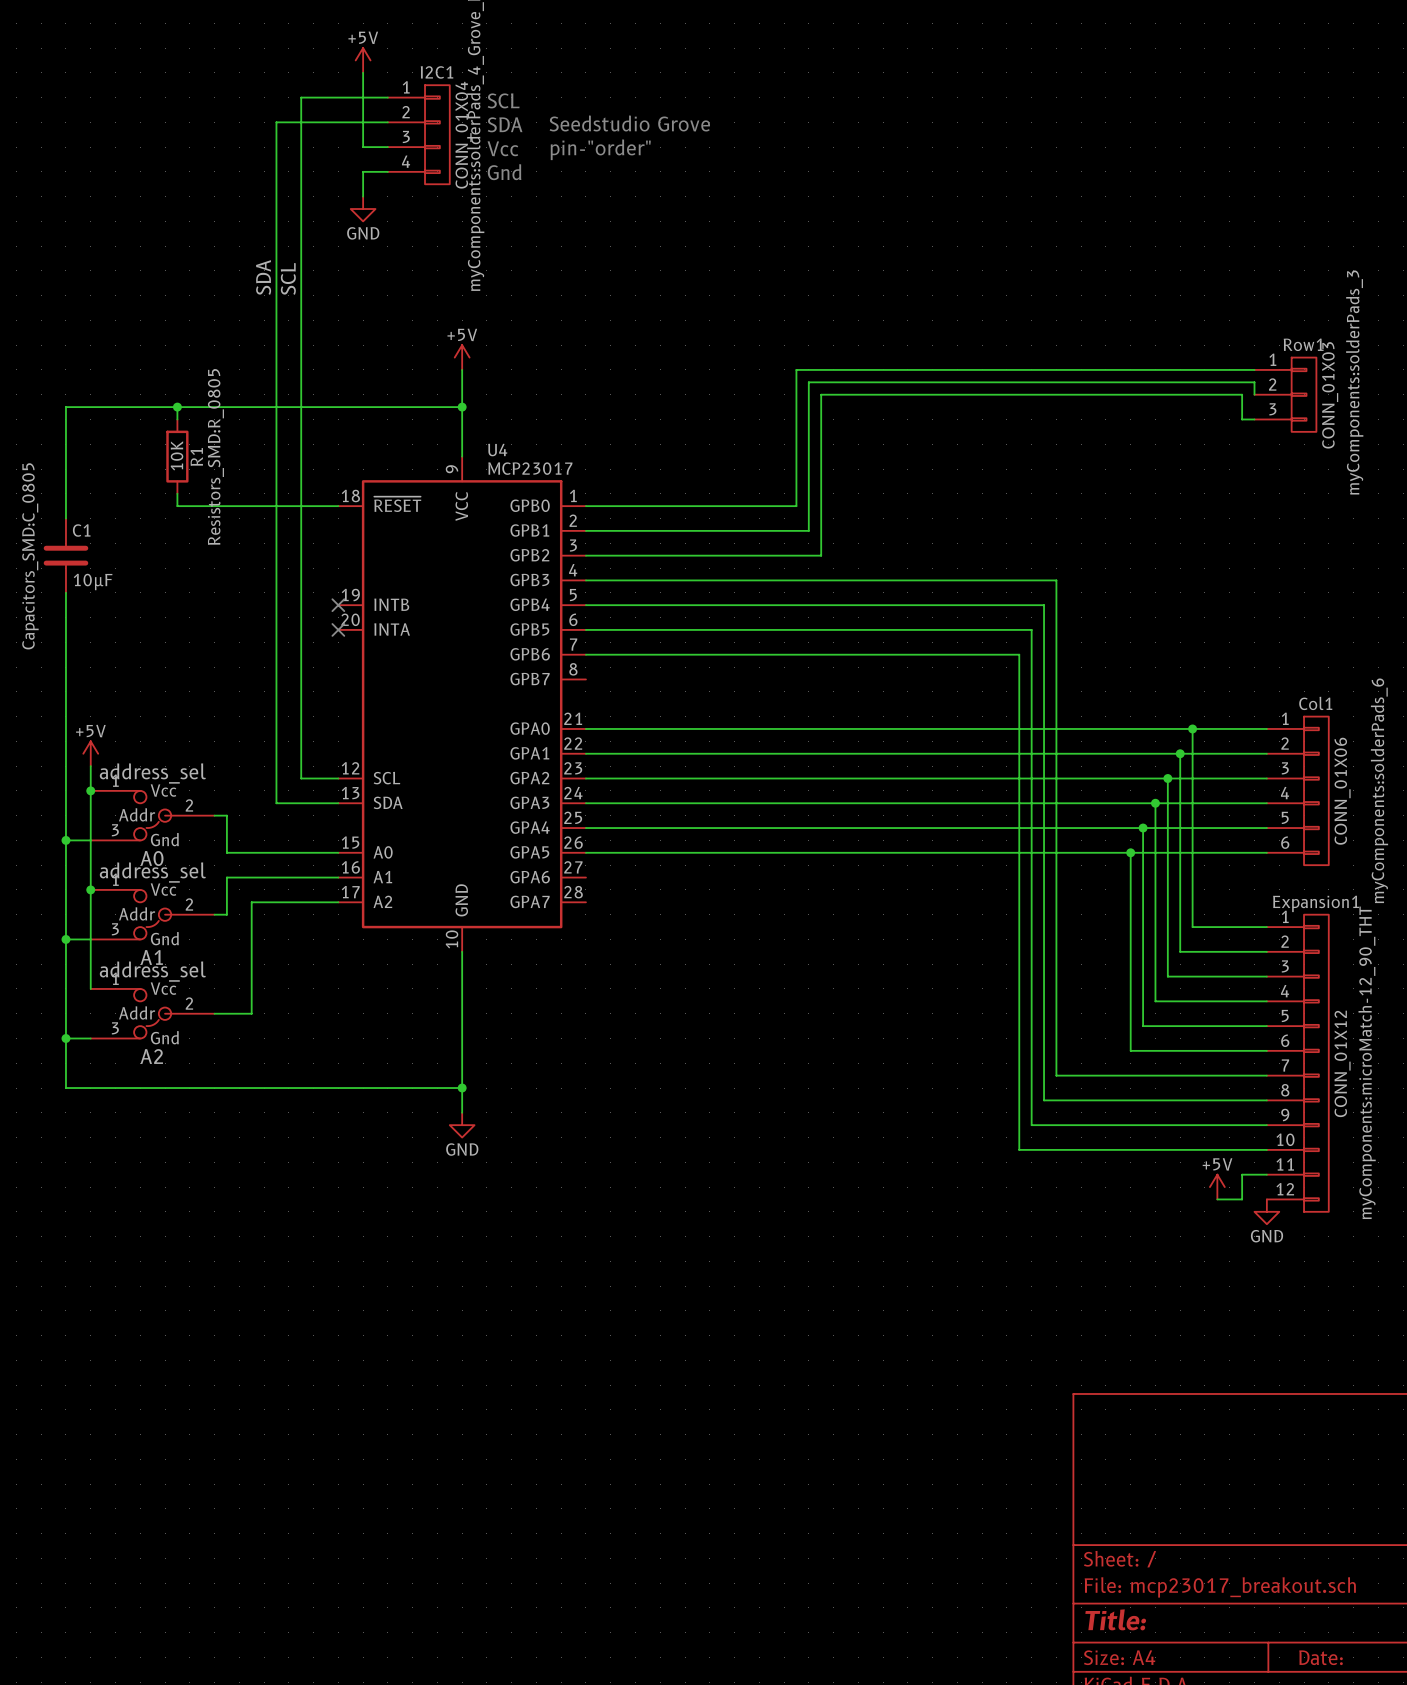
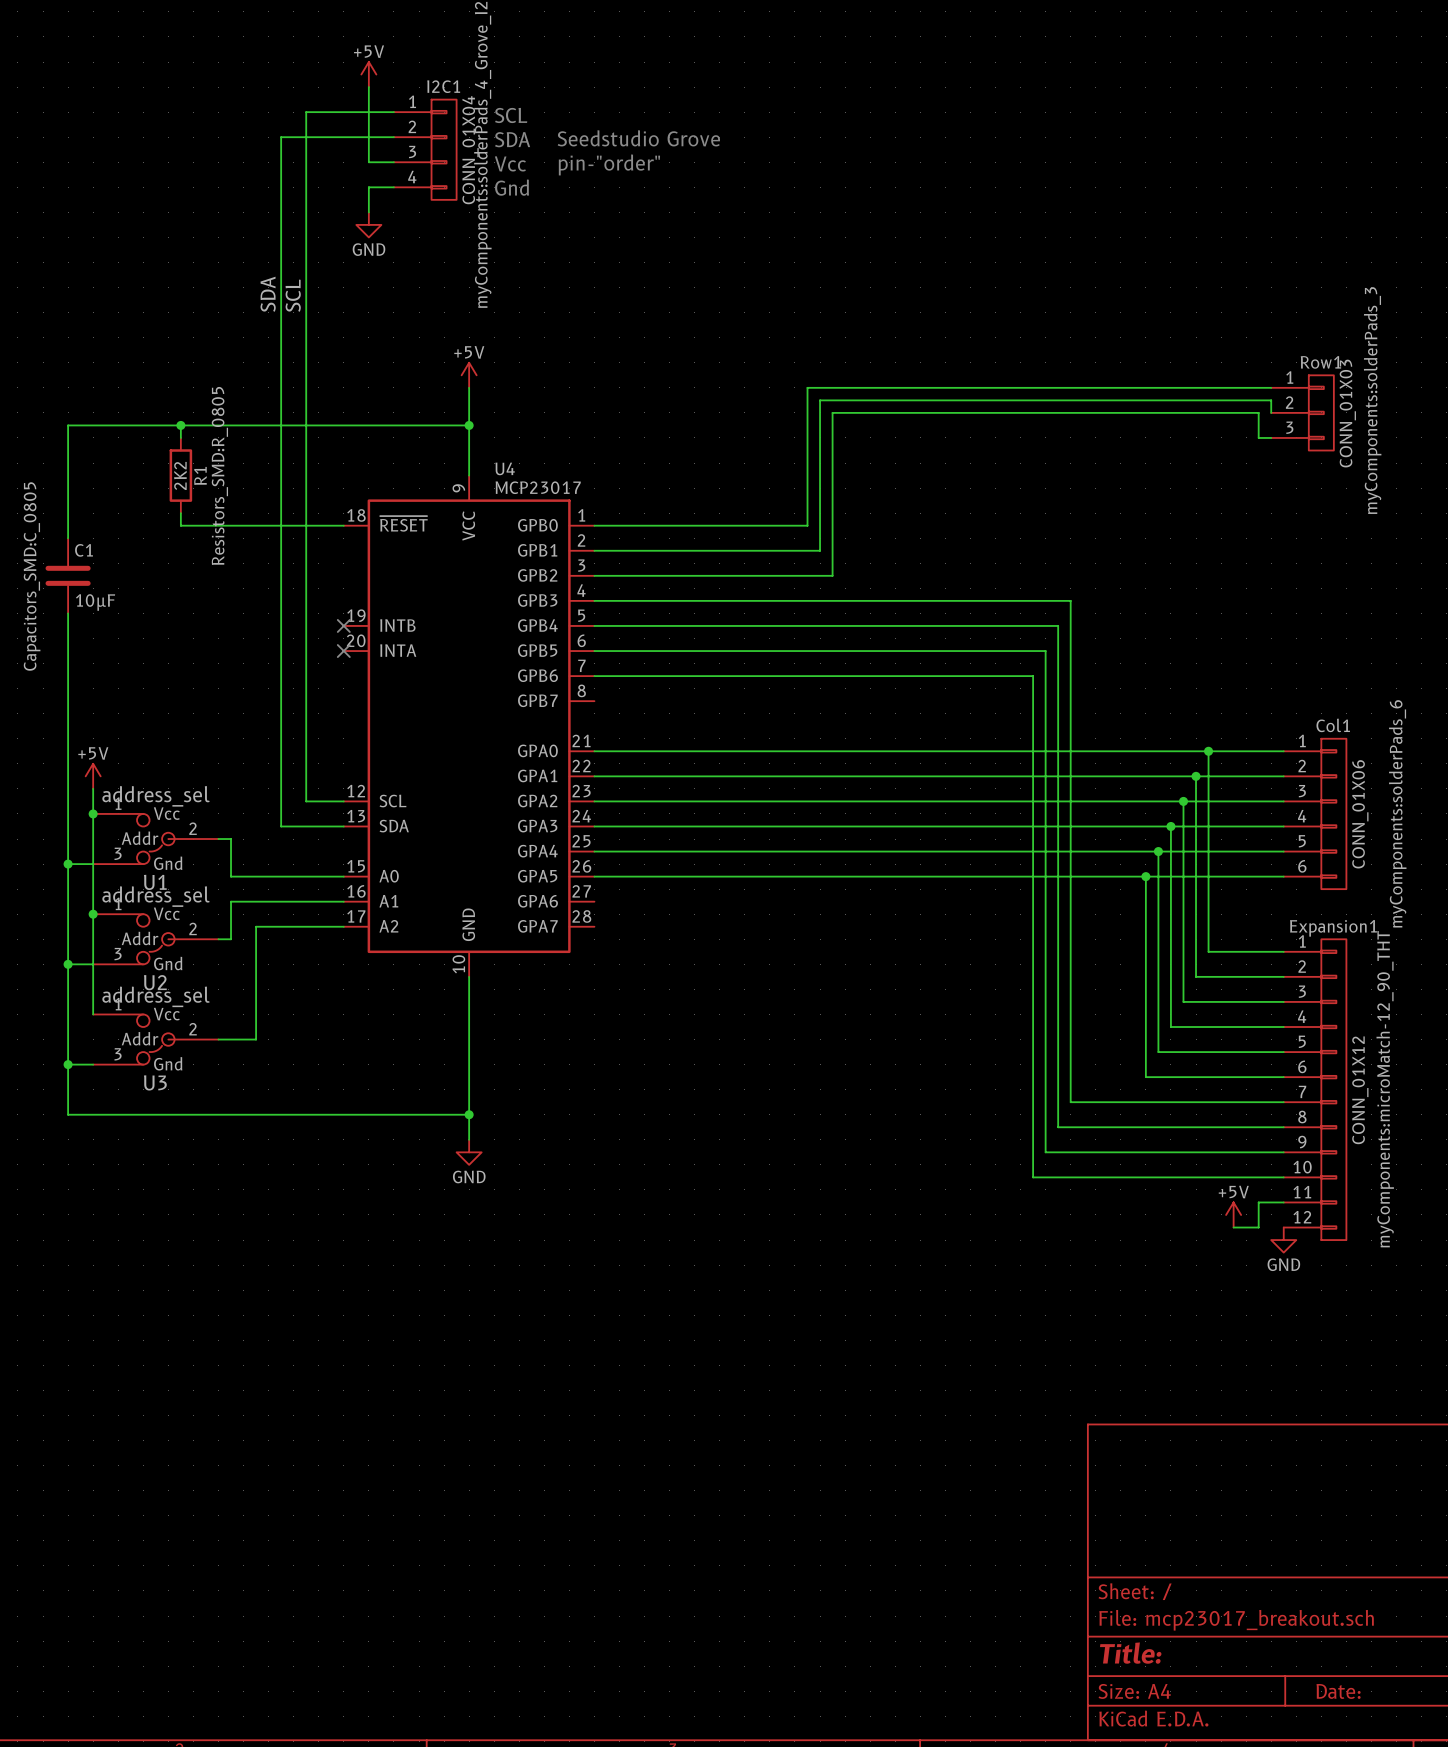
R1 value: 10K (177, 455) -> 2K2 (180, 475)
A0 name: A0 (152, 858) -> U1 (155, 882)
A1 name: A1 (151, 957) -> U2 (155, 982)
A2 name: A2 (151, 1056) -> U3 (155, 1082)

